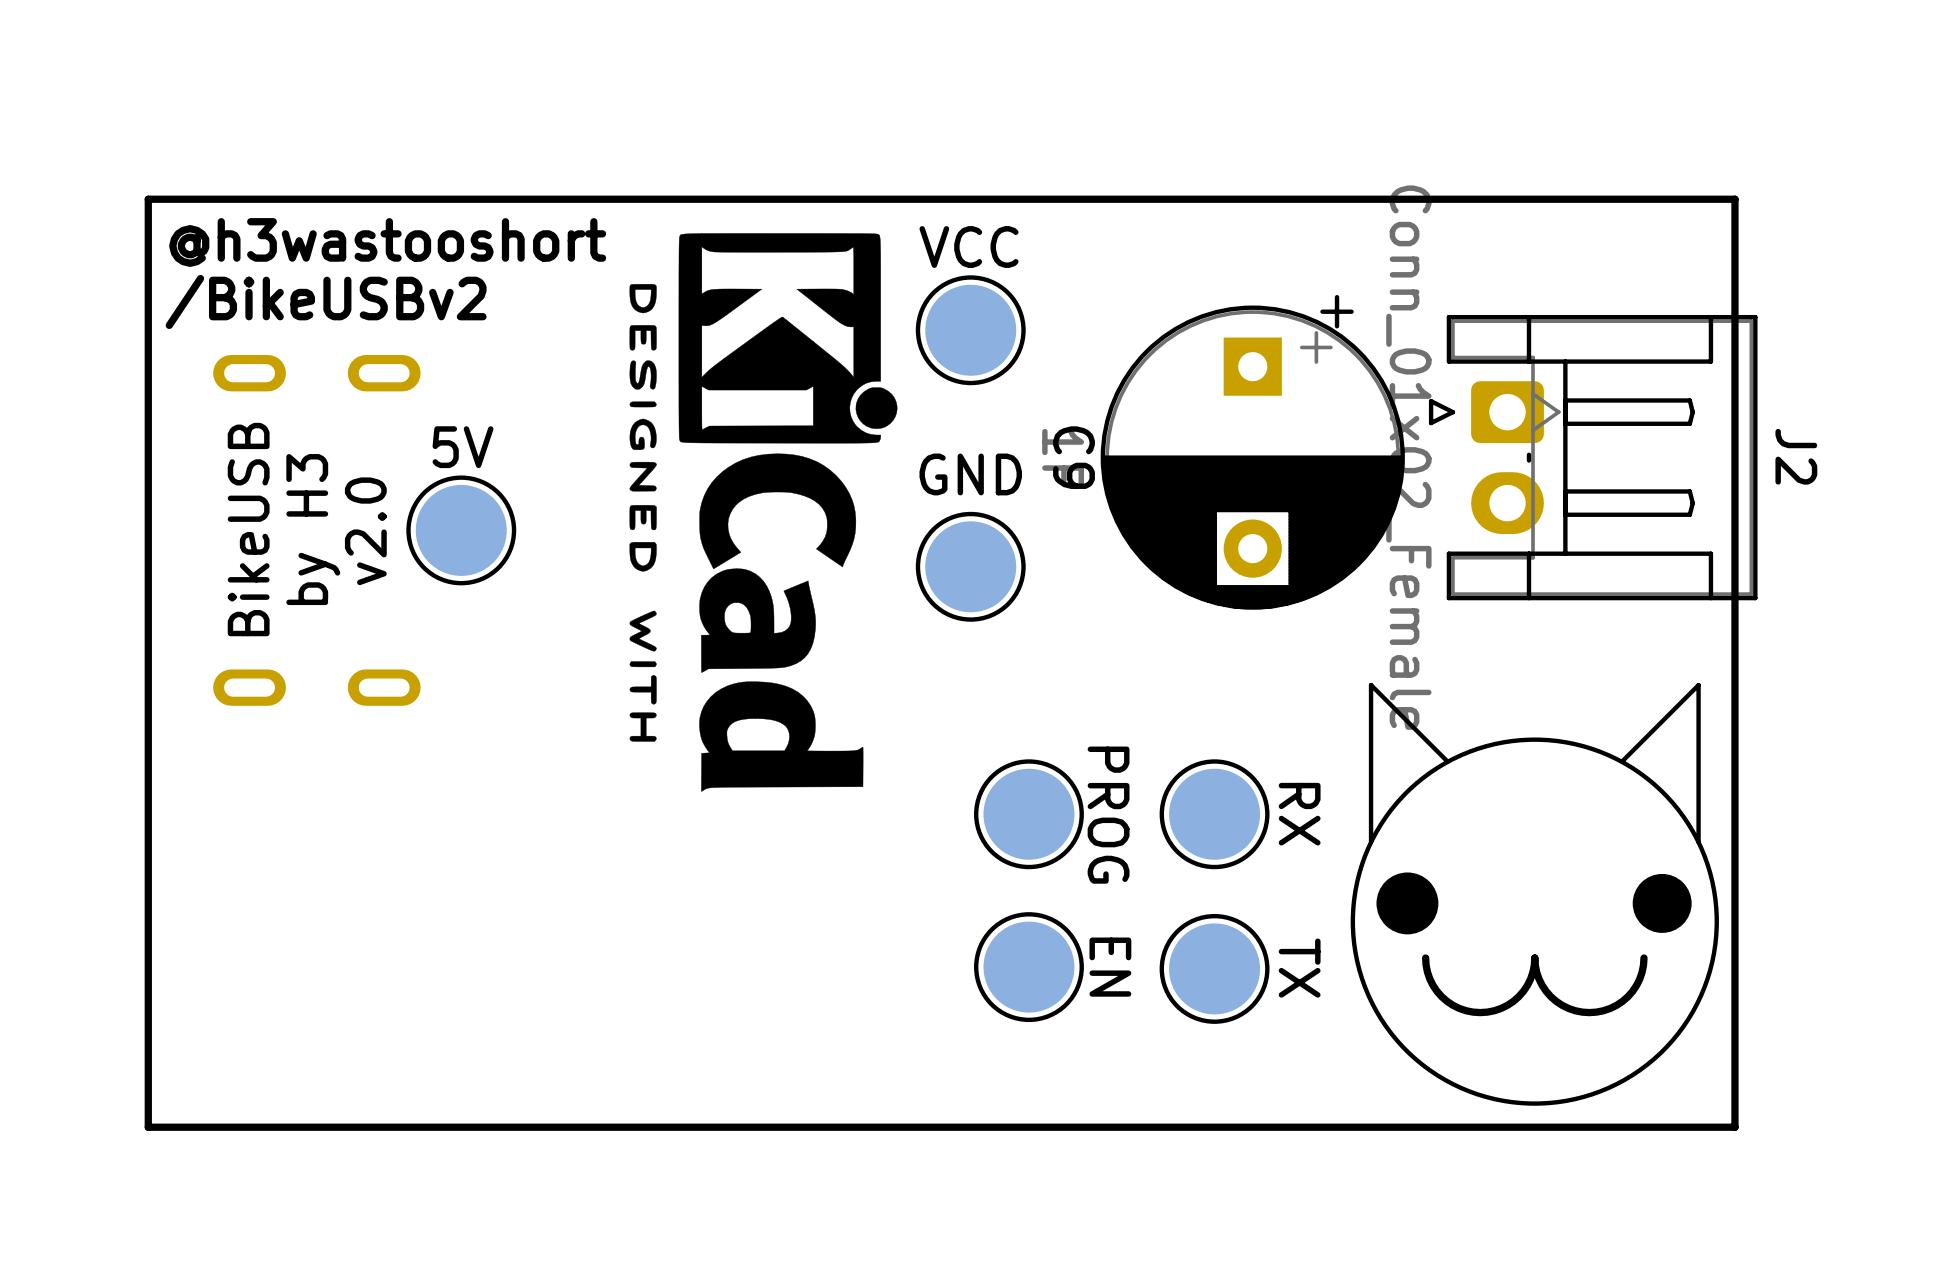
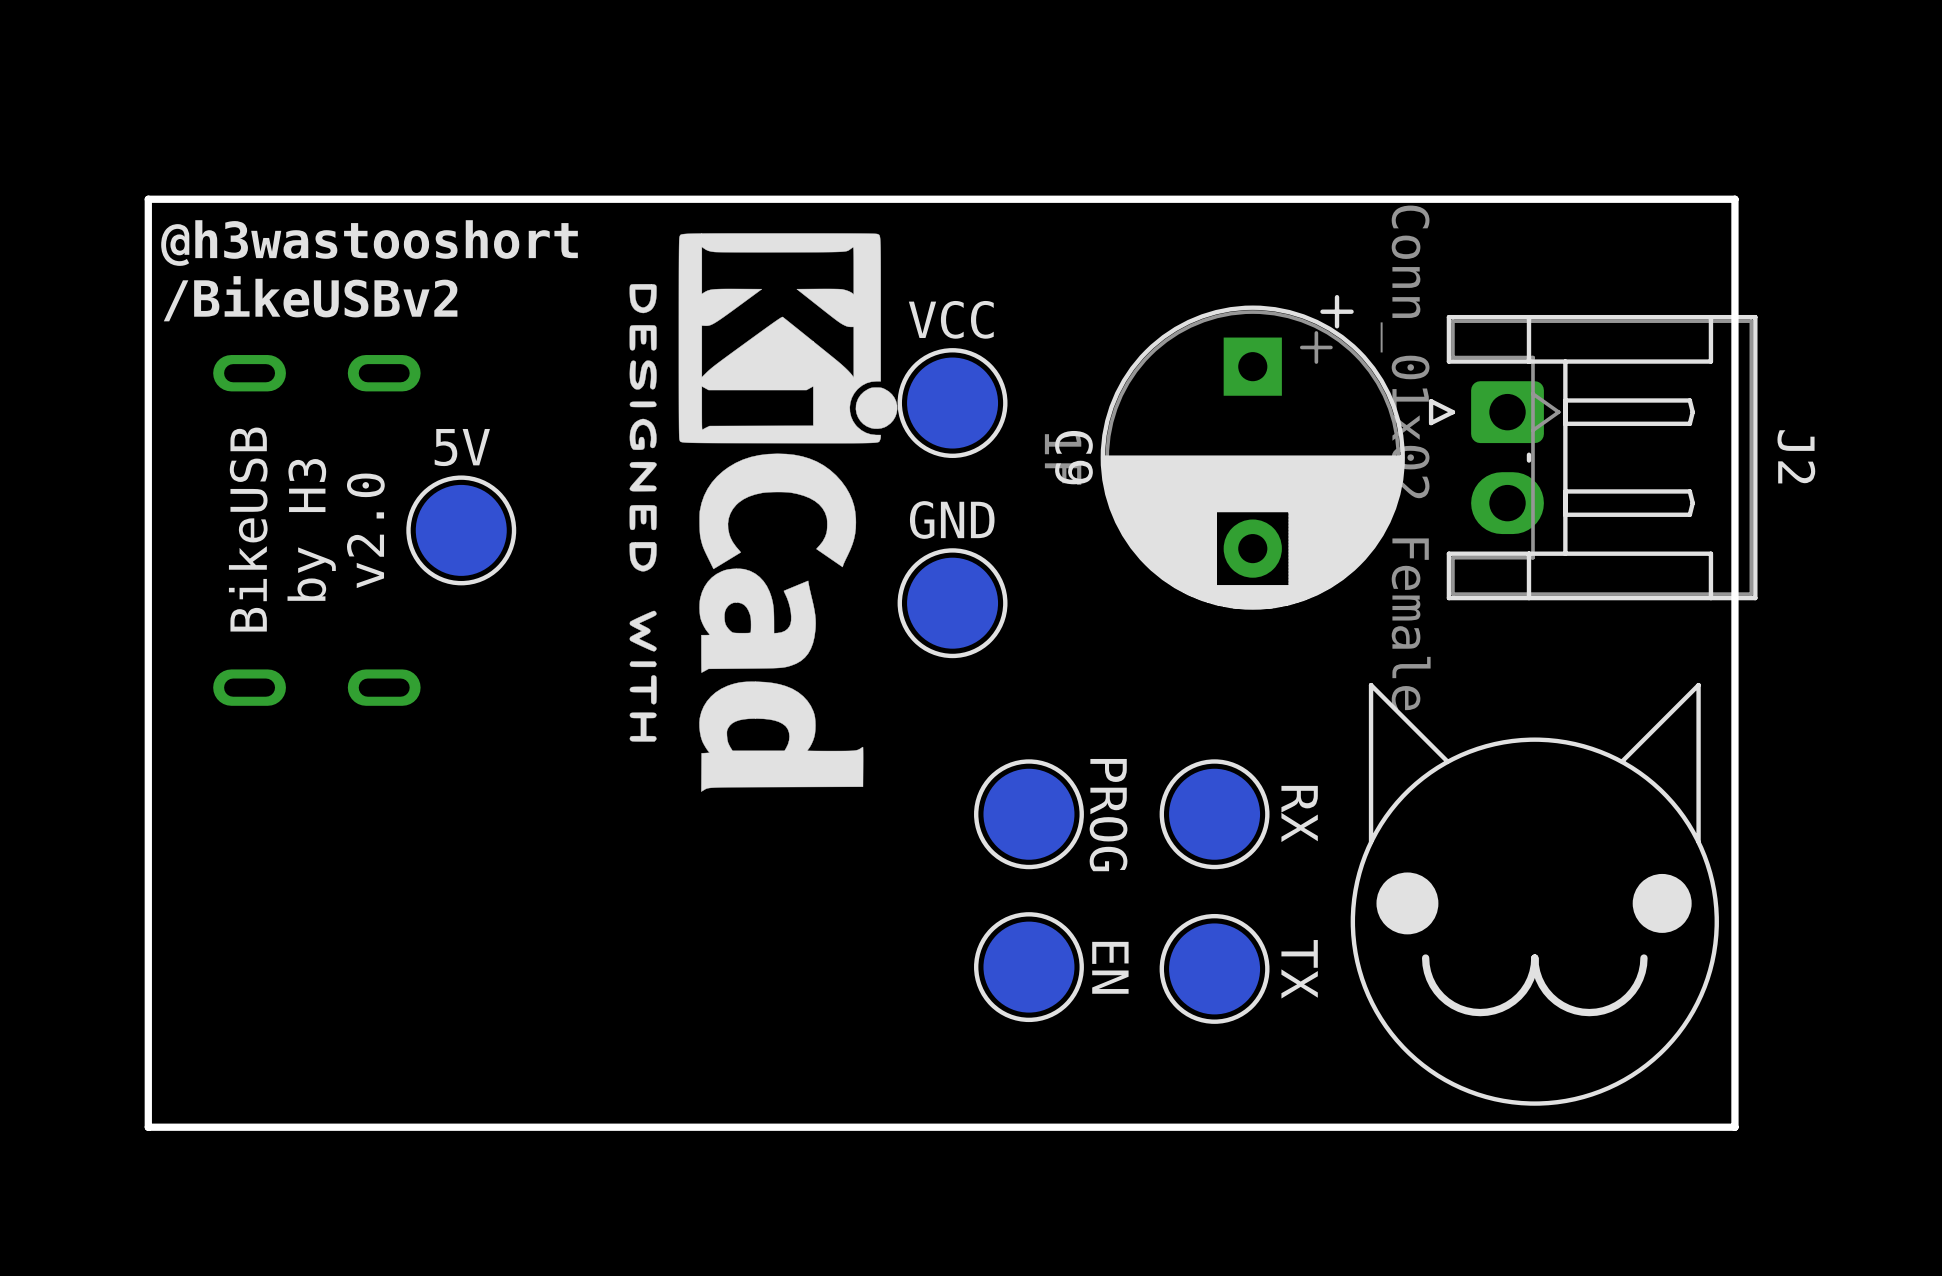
part position: (970, 330) -> (952, 403)
part value position: GND (970, 474) -> GND (952, 519)
part position: (970, 566) -> (952, 603)

